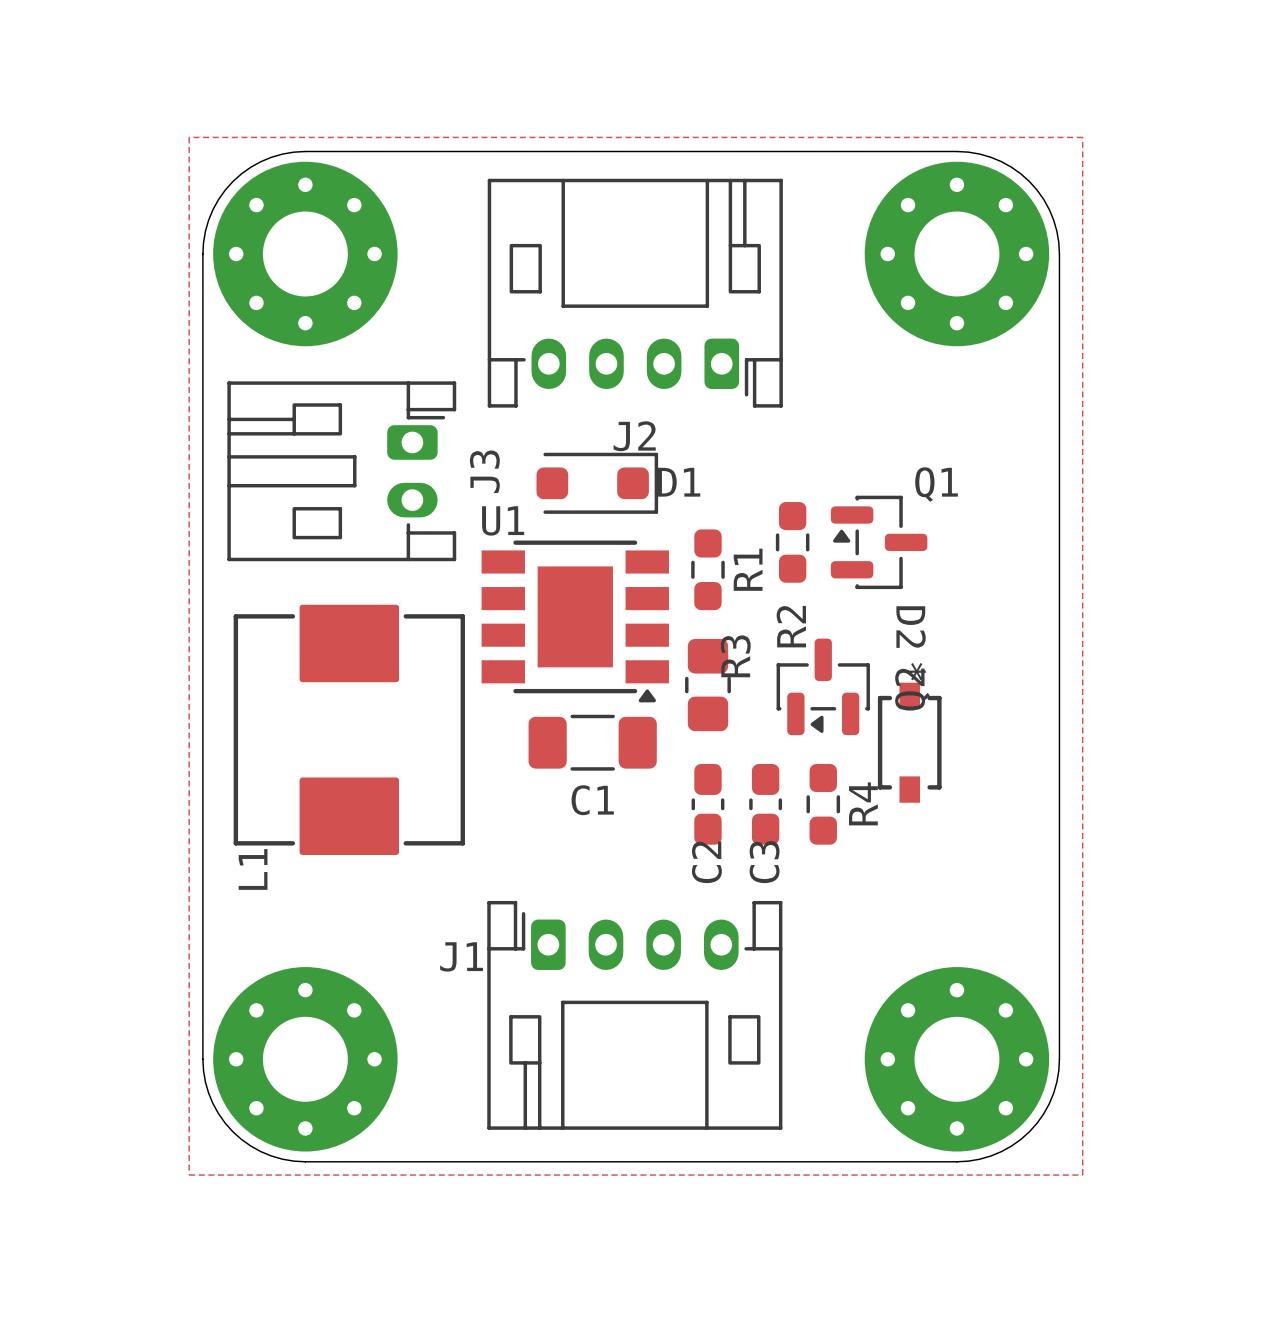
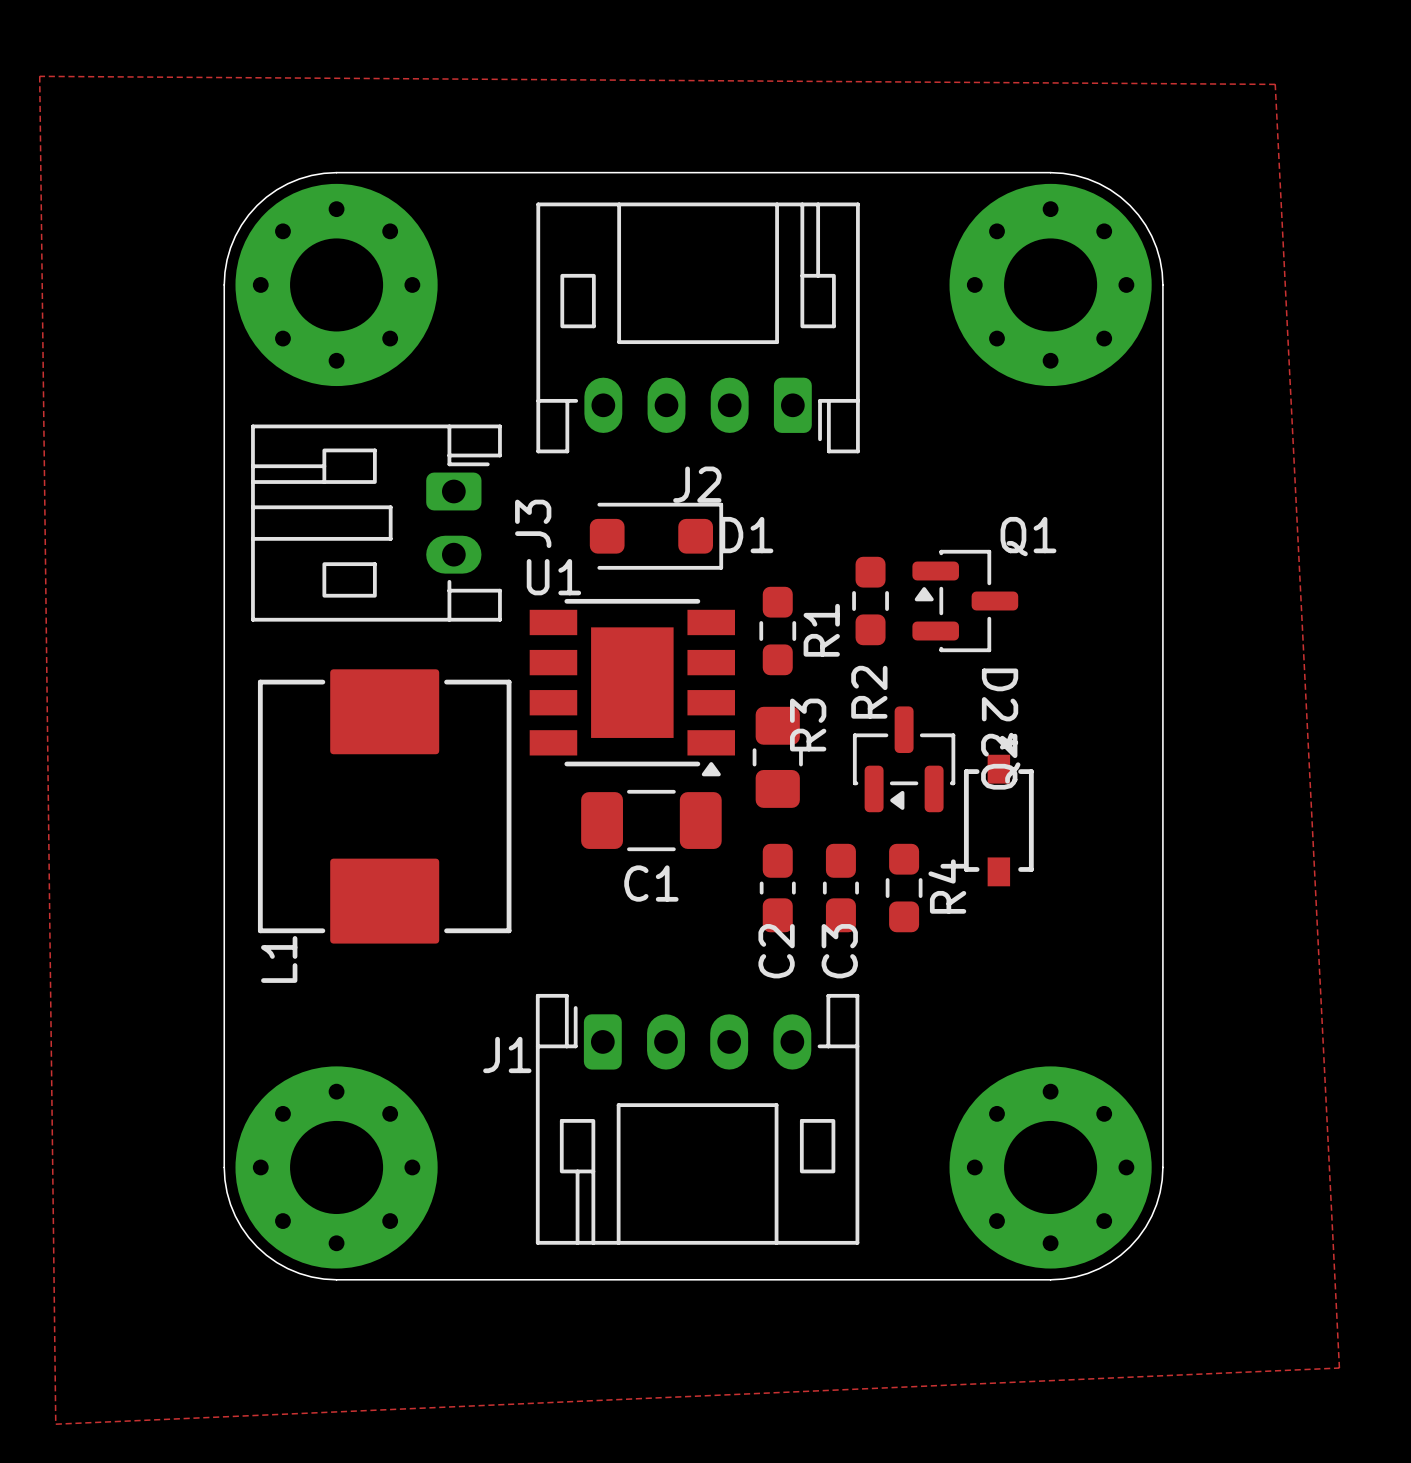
zone outline: (189, 137) (1082, 137) (1082, 1175) (189, 1175) (189, 137) -> (39, 76) (55, 1424) (1339, 1368) (1275, 84) (39, 76)

